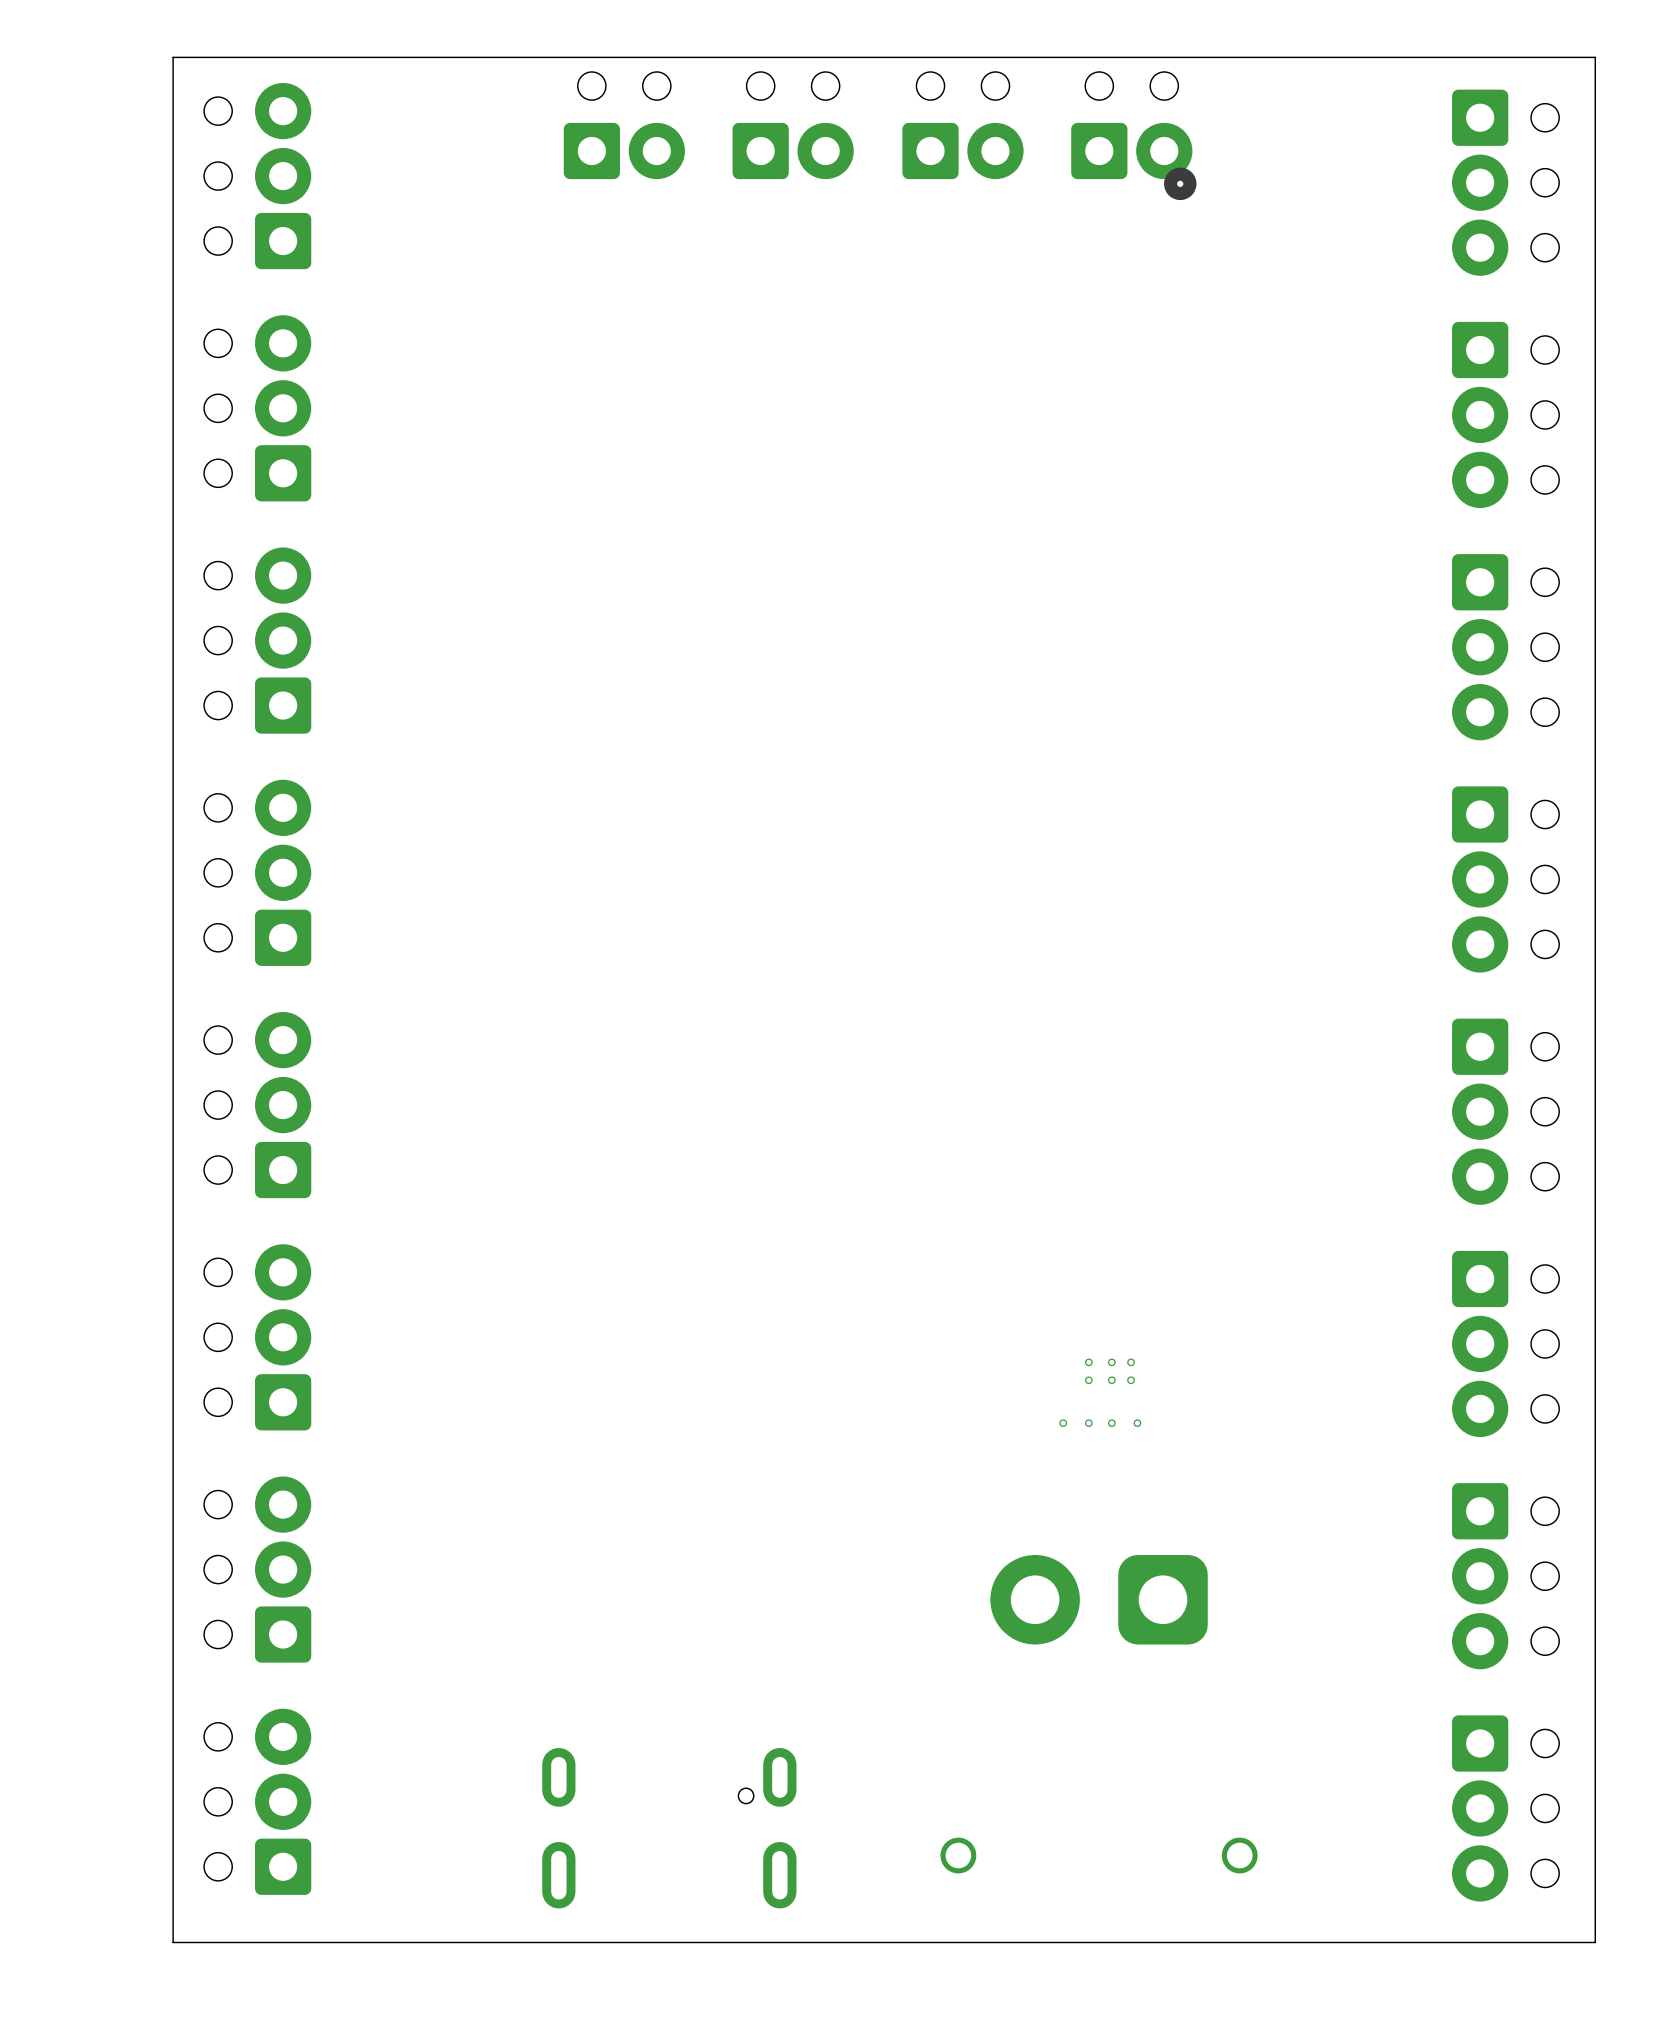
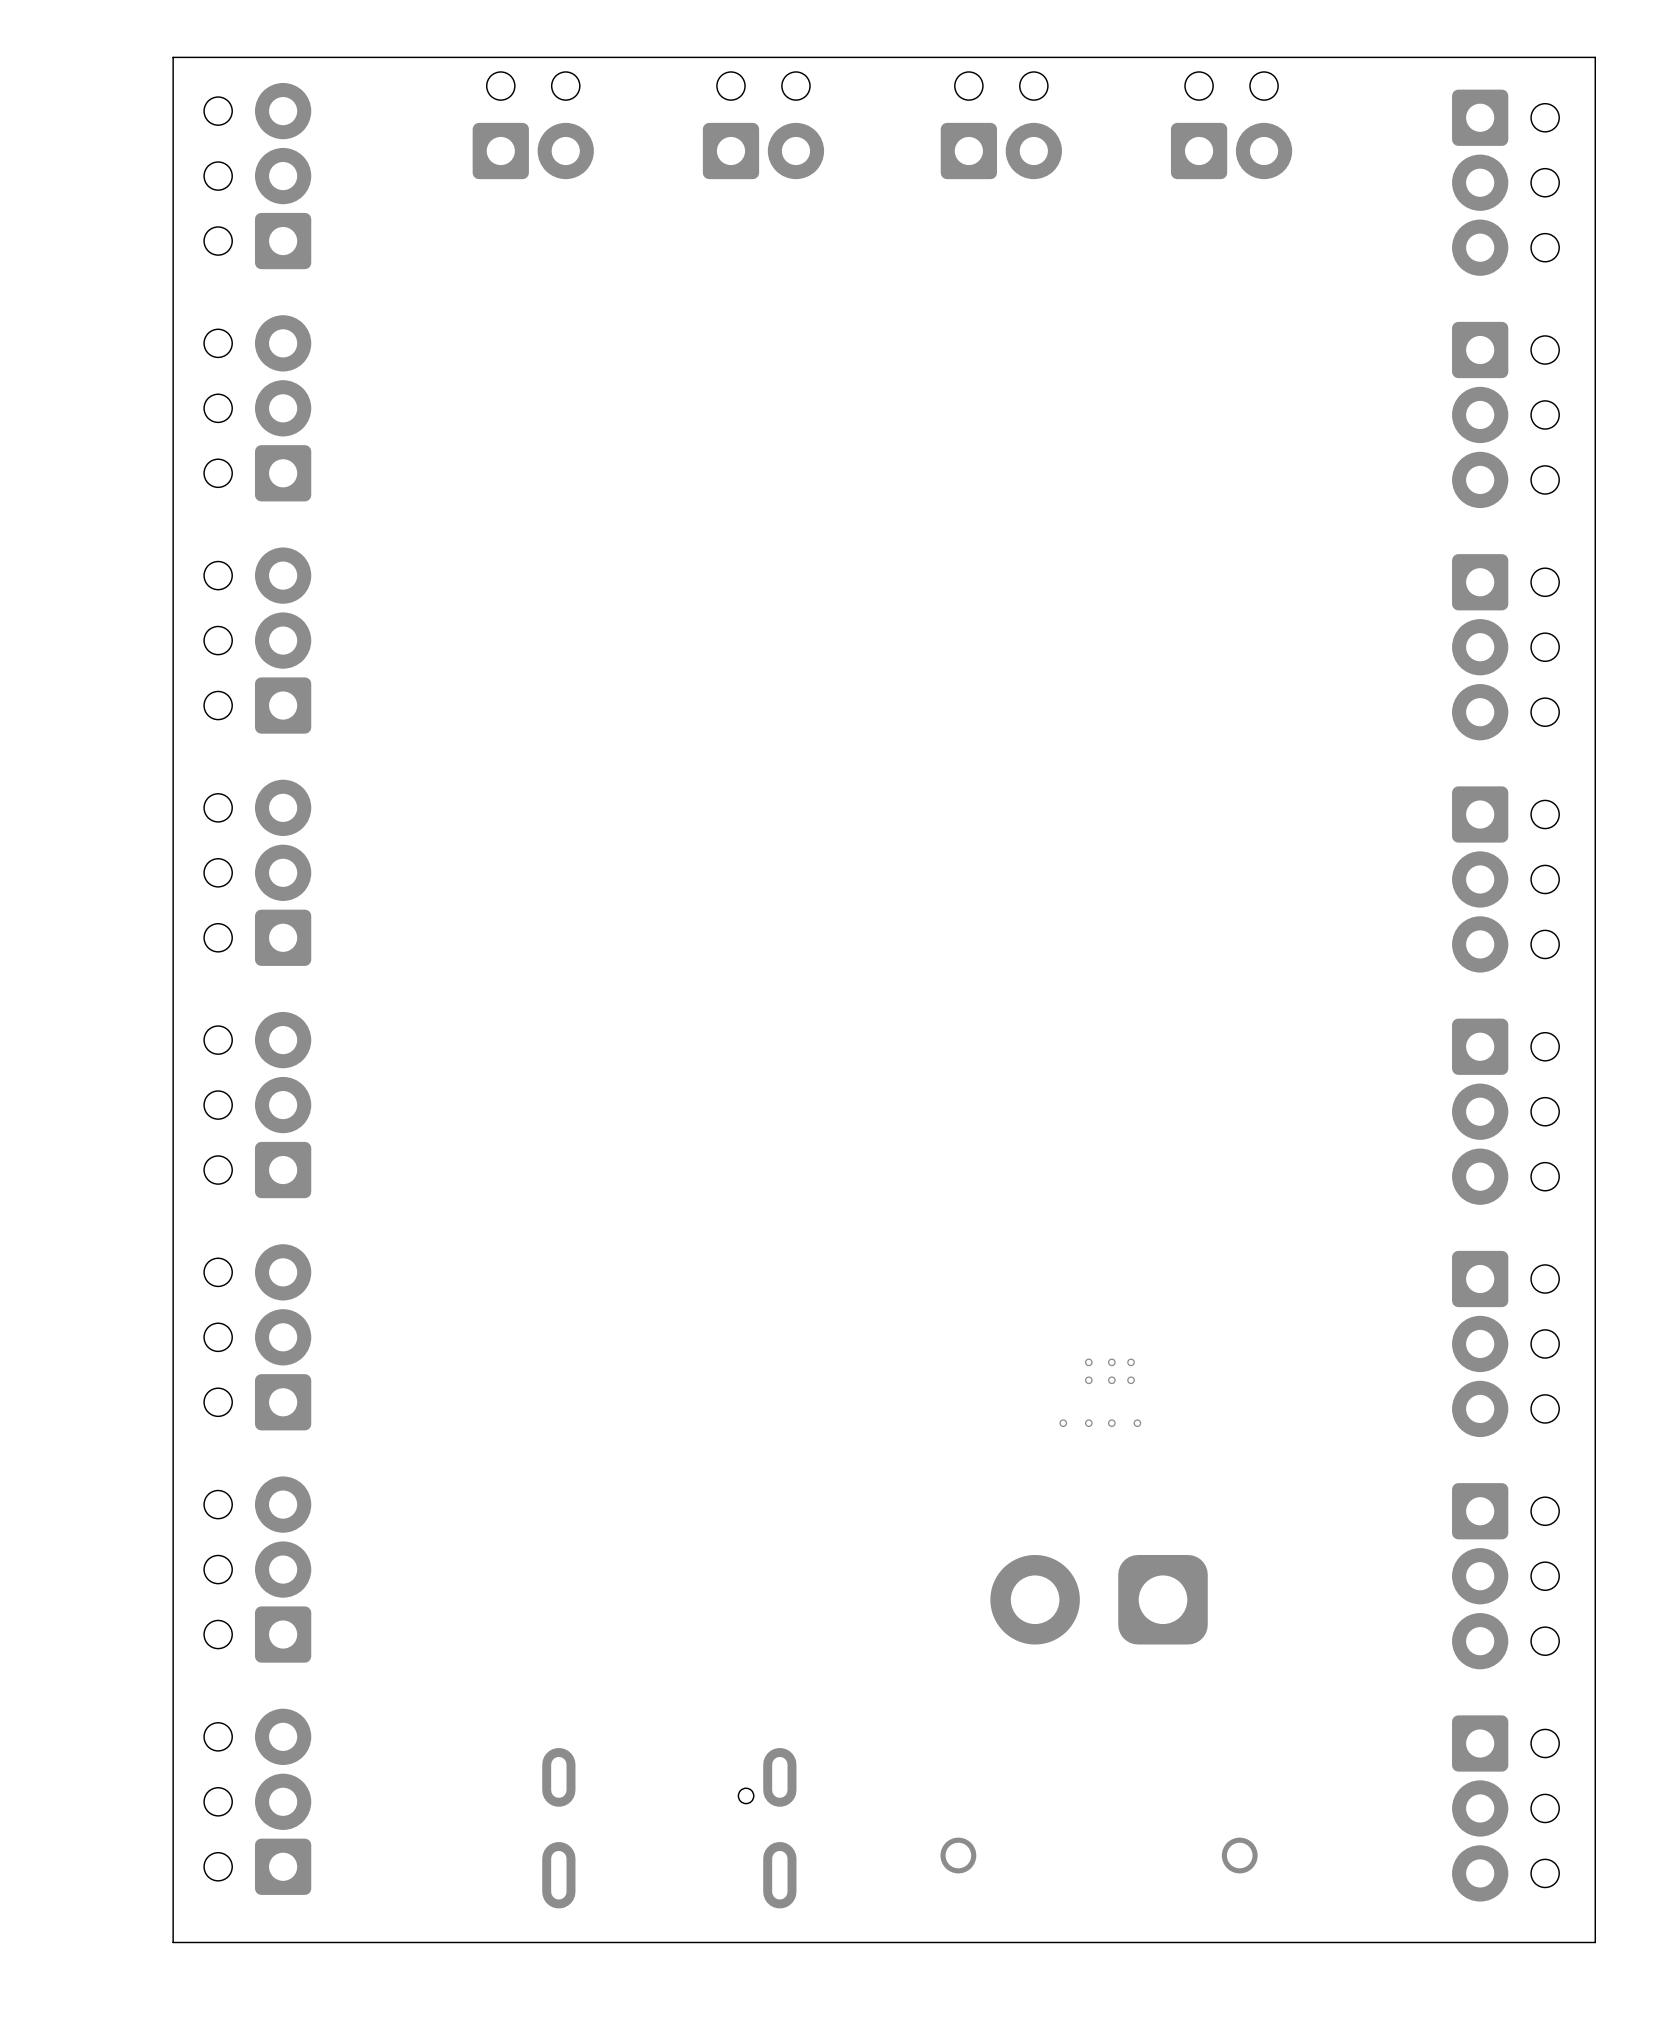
part: none -> (533, 125)
part: (624, 125) -> none
part position: (793, 125) -> (763, 125)
part position: (962, 125) -> (1001, 125)
part: (1131, 125) -> none
part: none -> (1231, 125)
part: (1180, 183) -> none

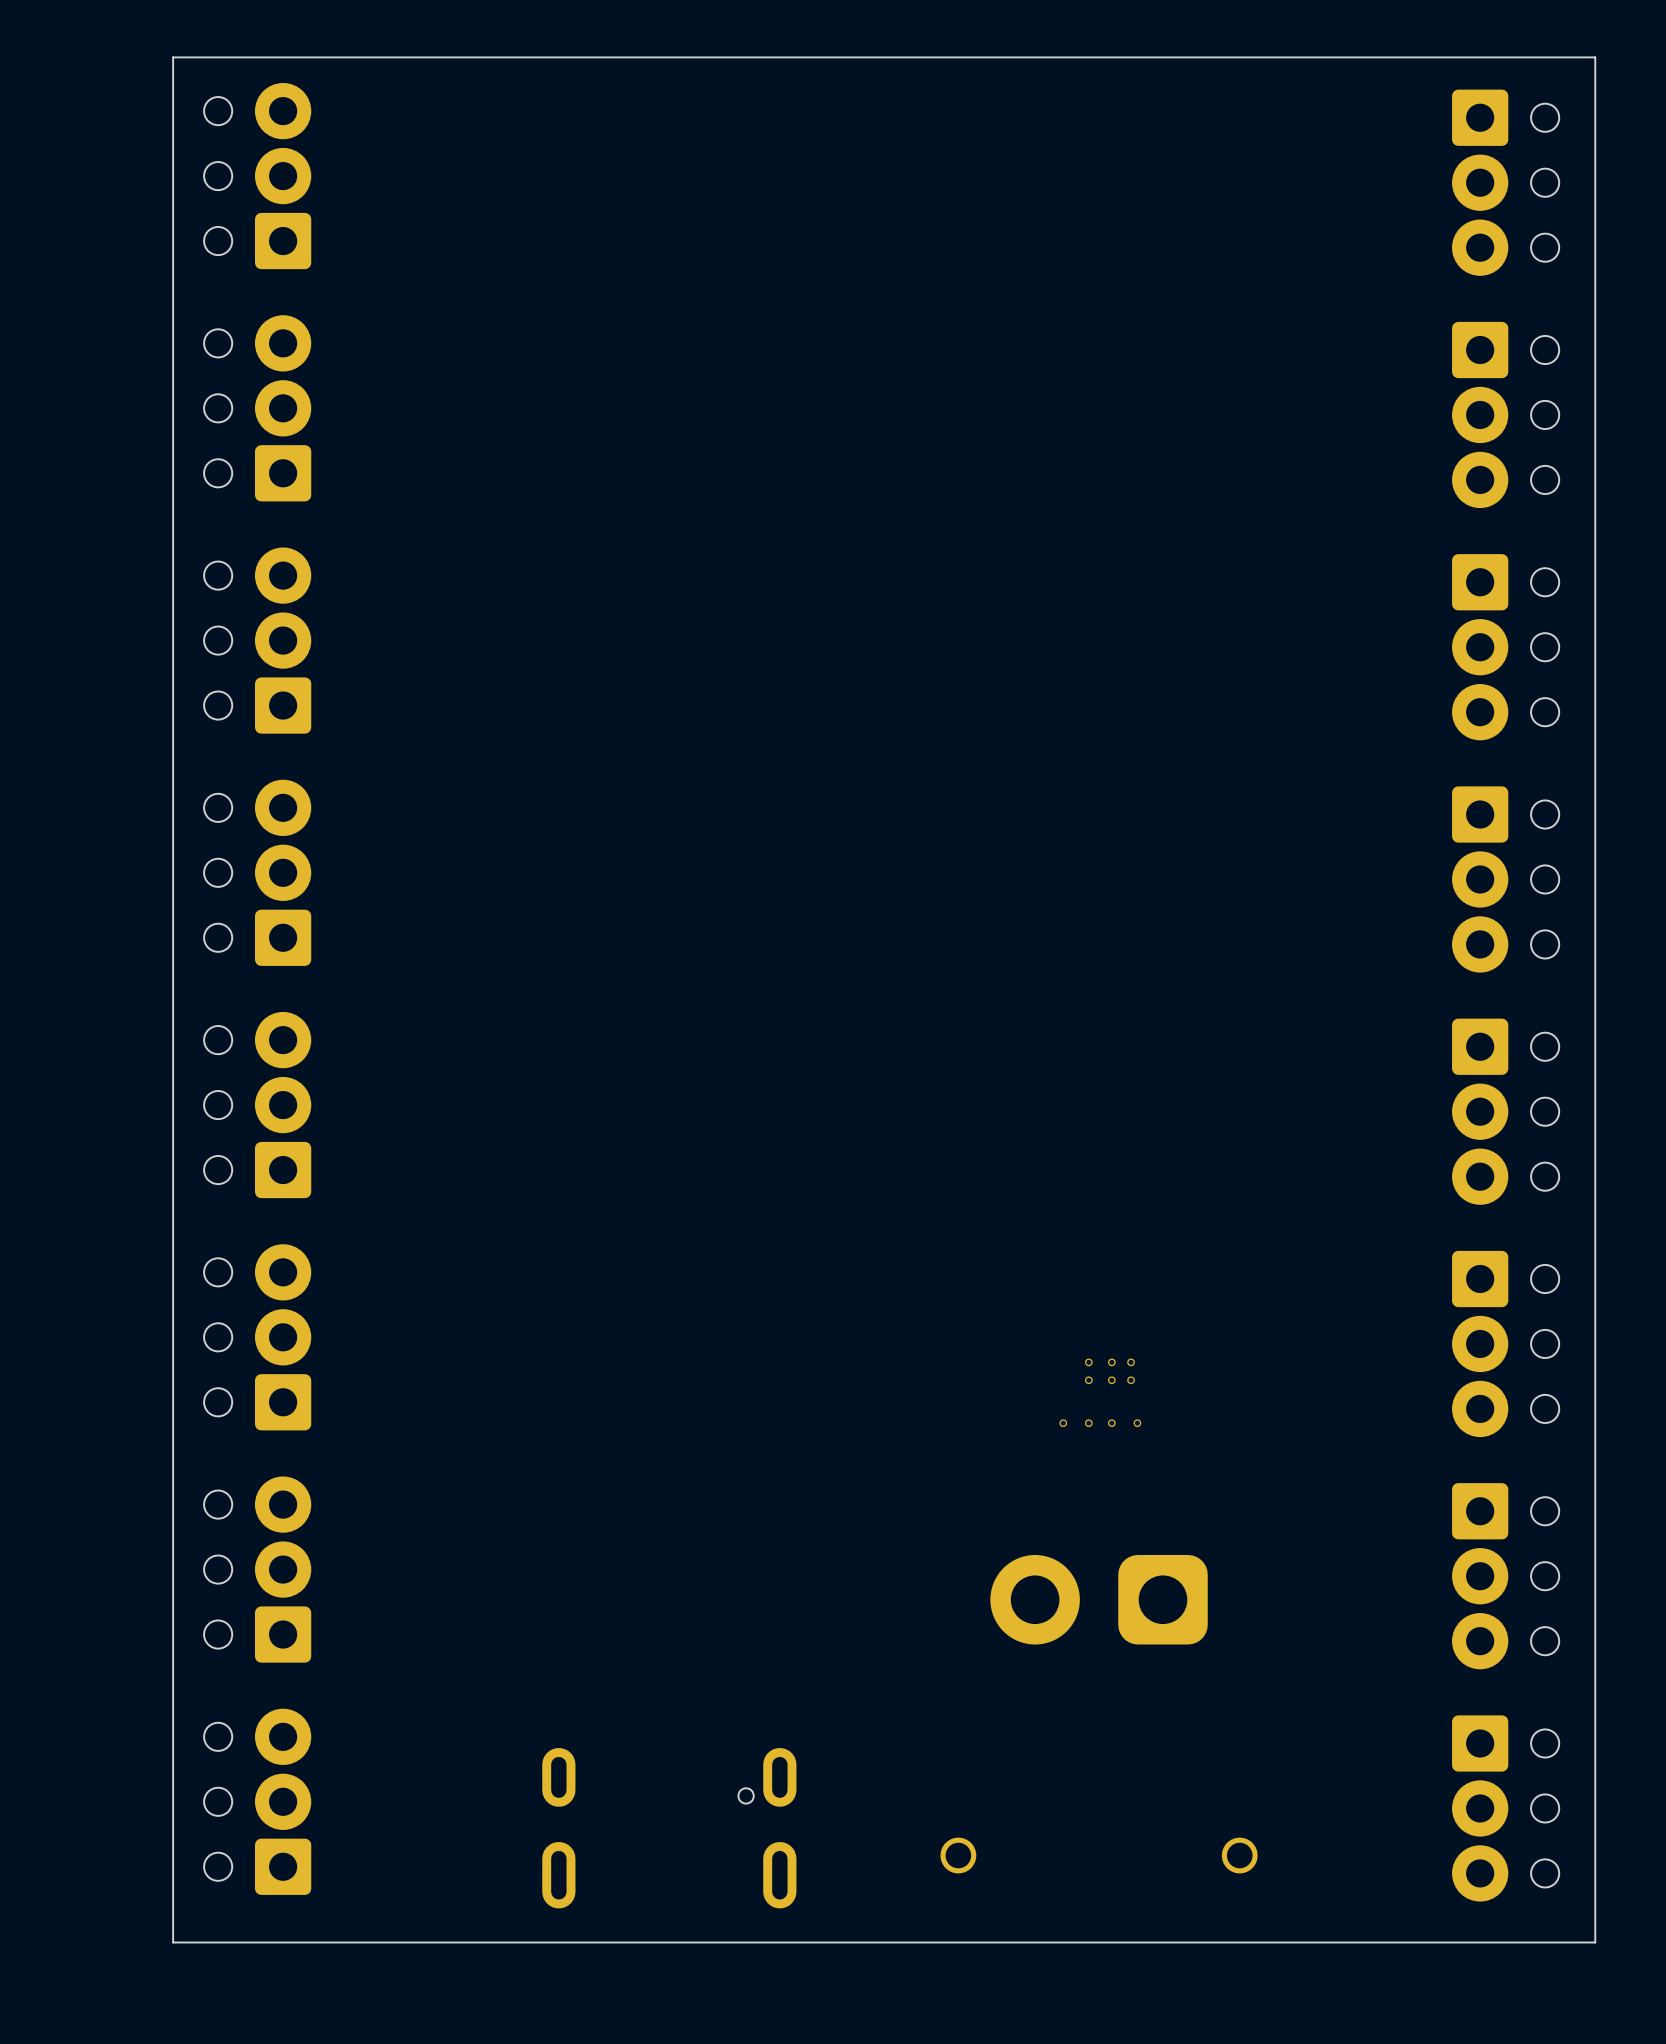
part: (533, 125) -> none
part: (763, 125) -> none
part: (1001, 125) -> none
part: (1231, 125) -> none

